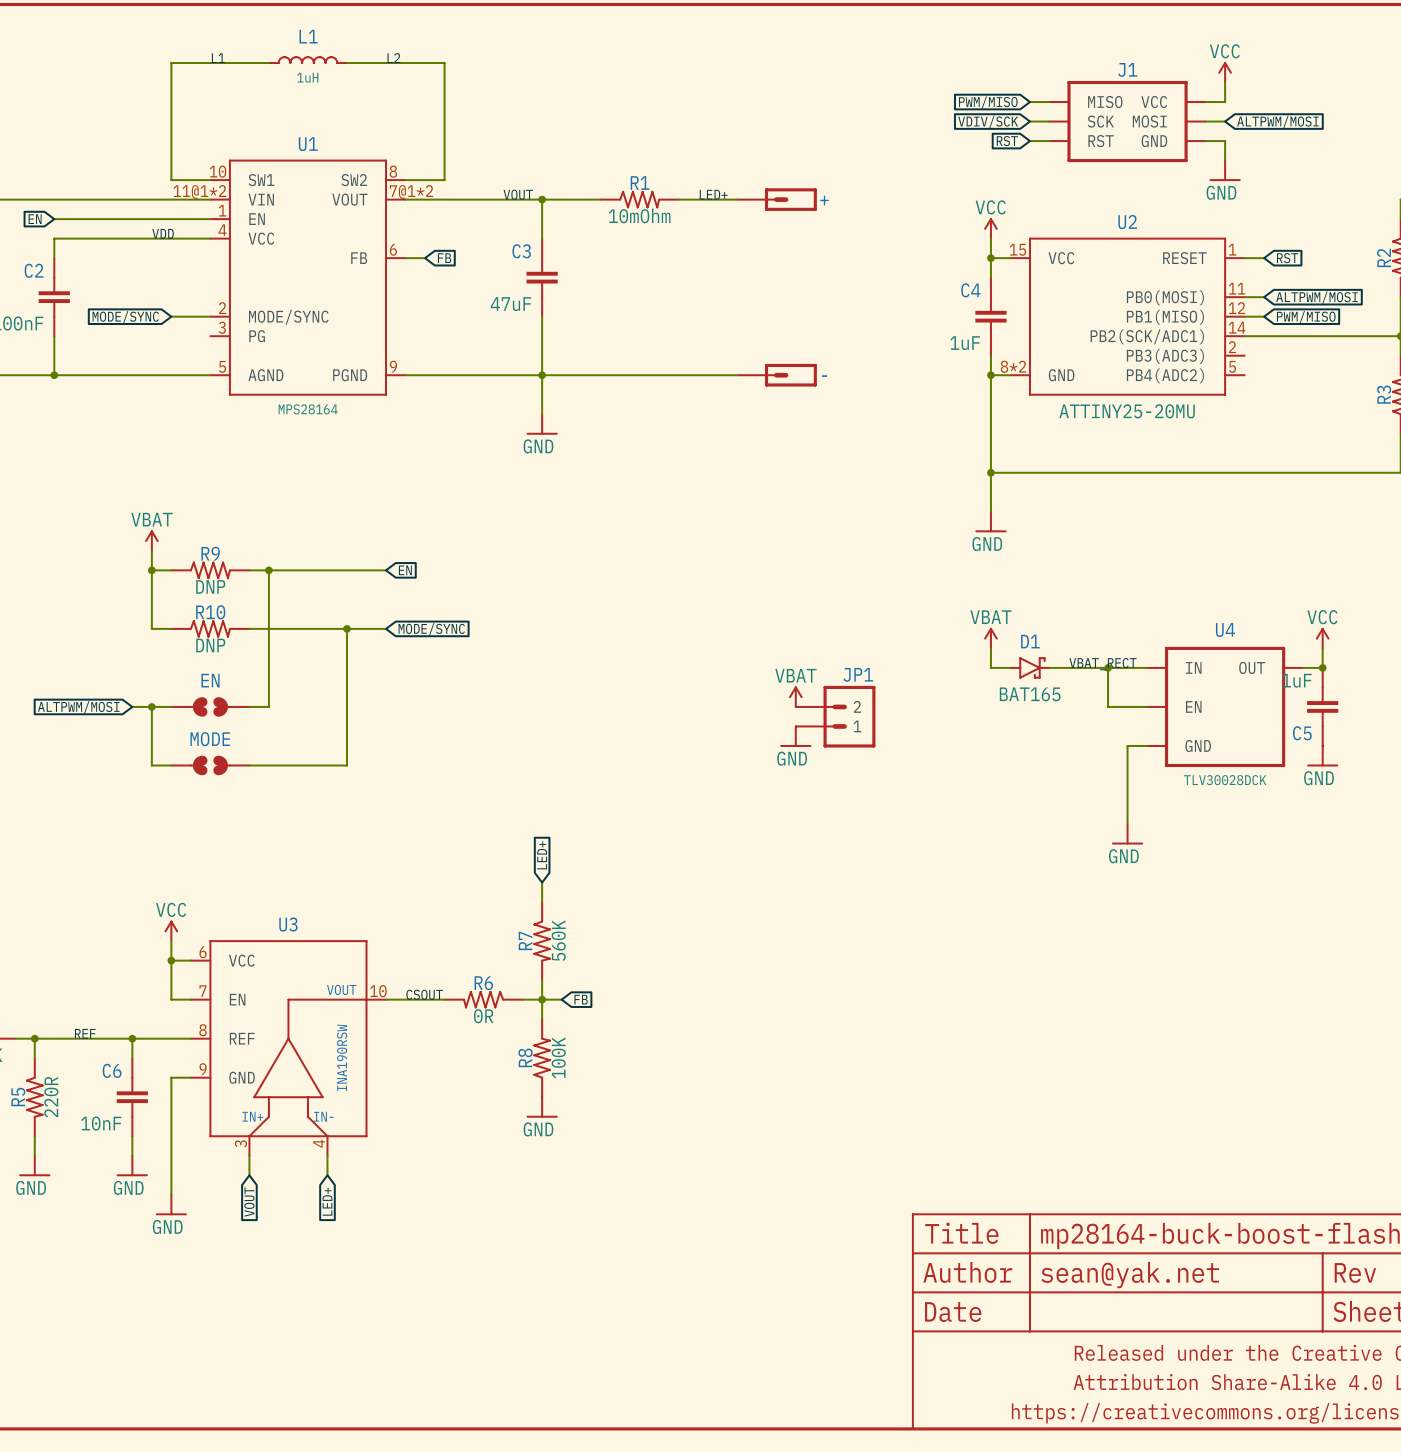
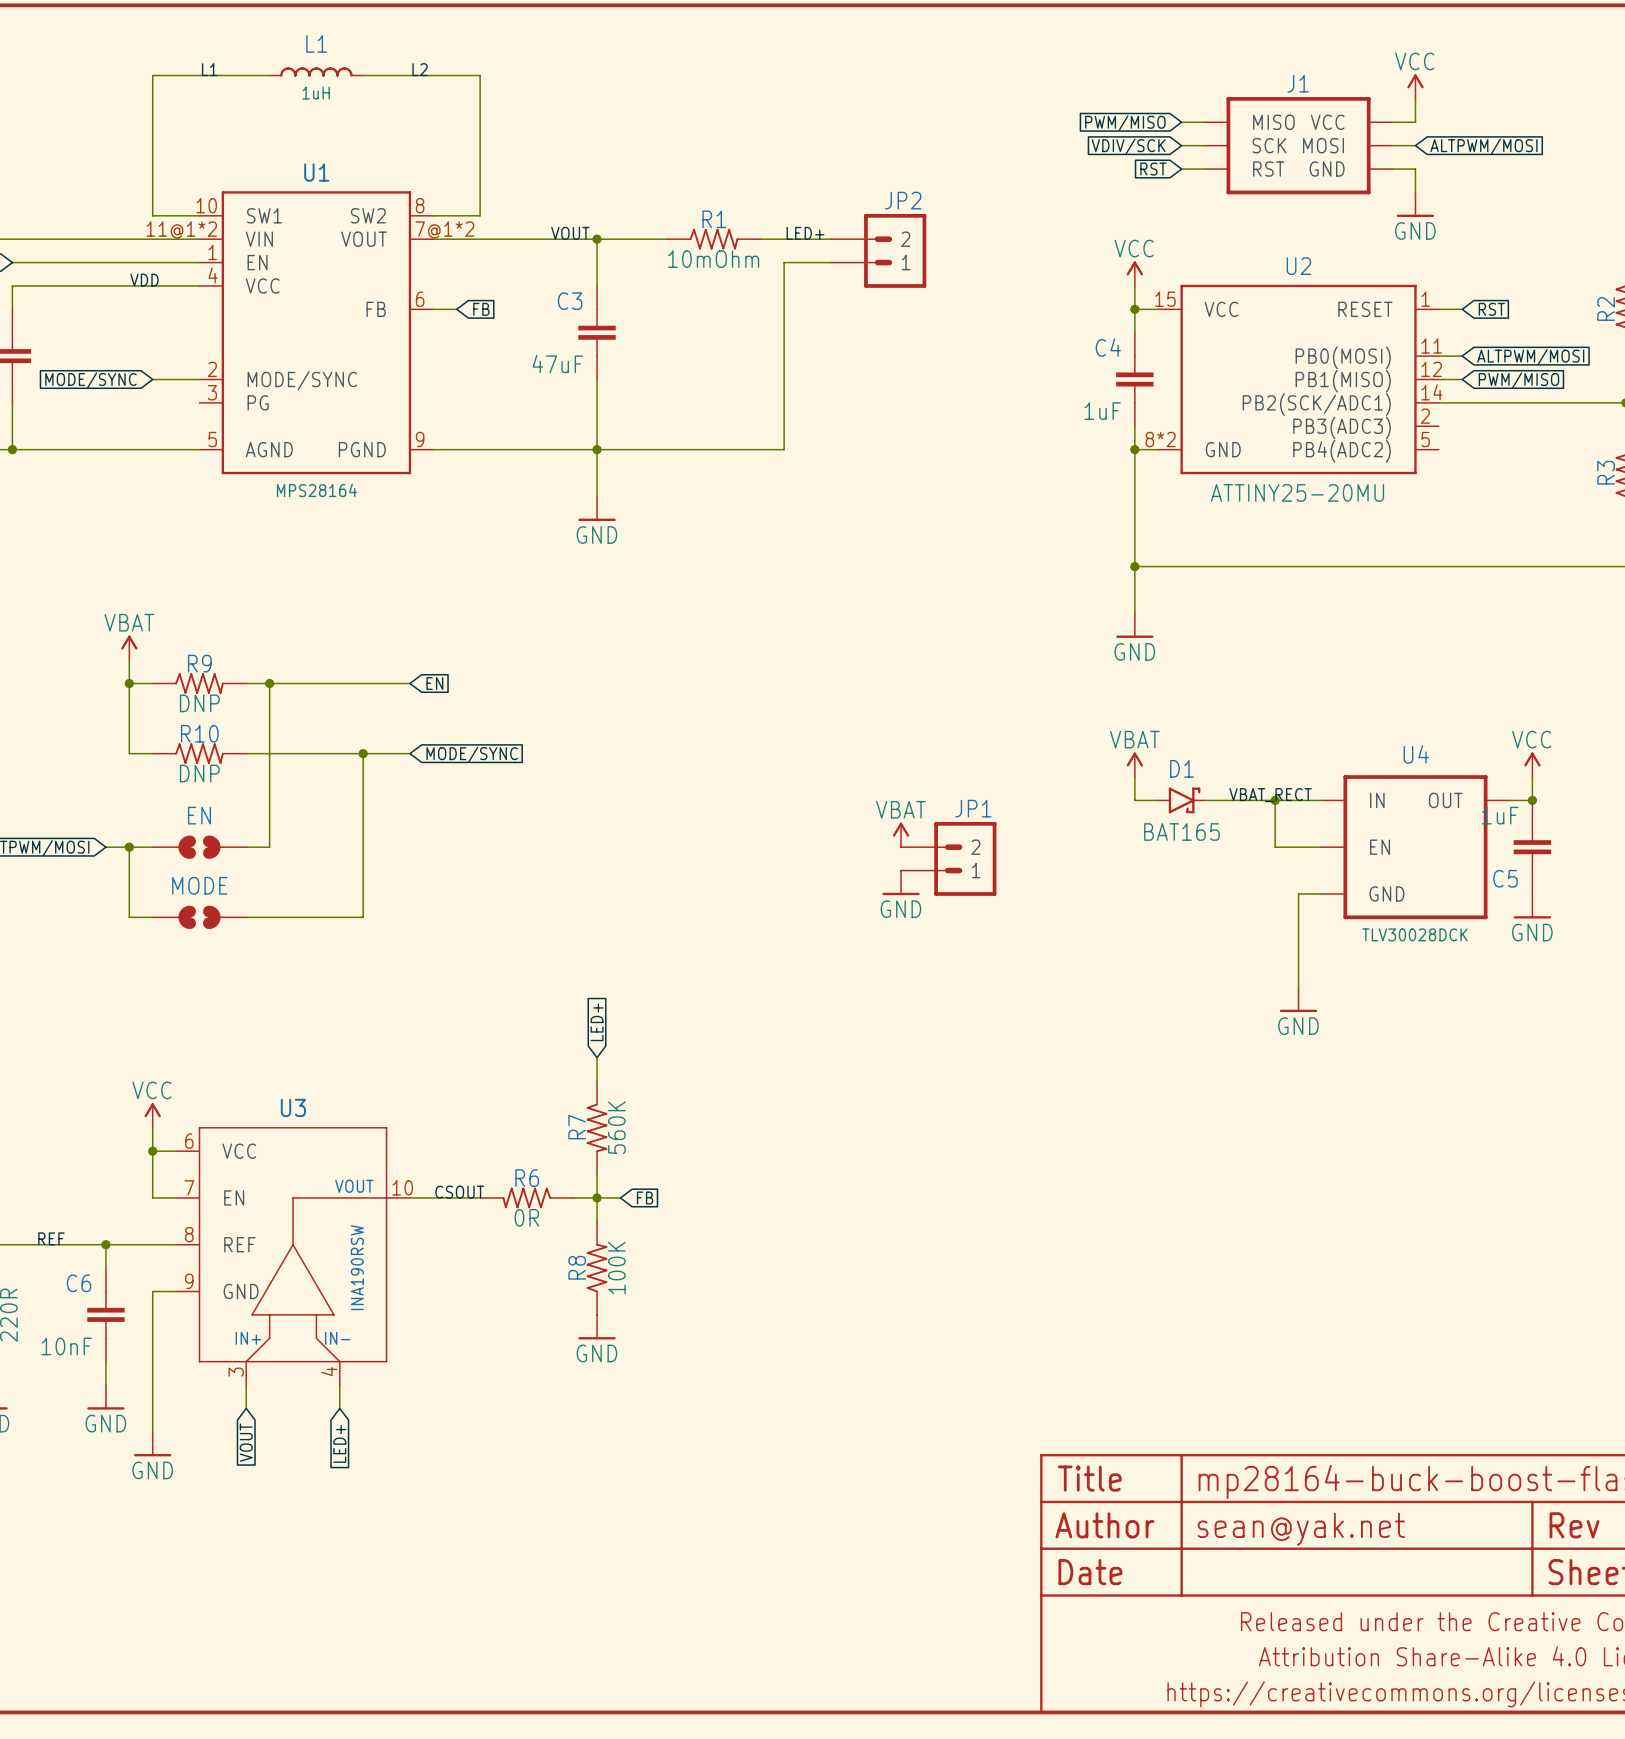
part: (777, 199) -> none
JP2: none -> (878, 250)
wire: (698, 375) (737, 375) -> (784, 449) (784, 262) (830, 262)
part: (777, 375) -> none

